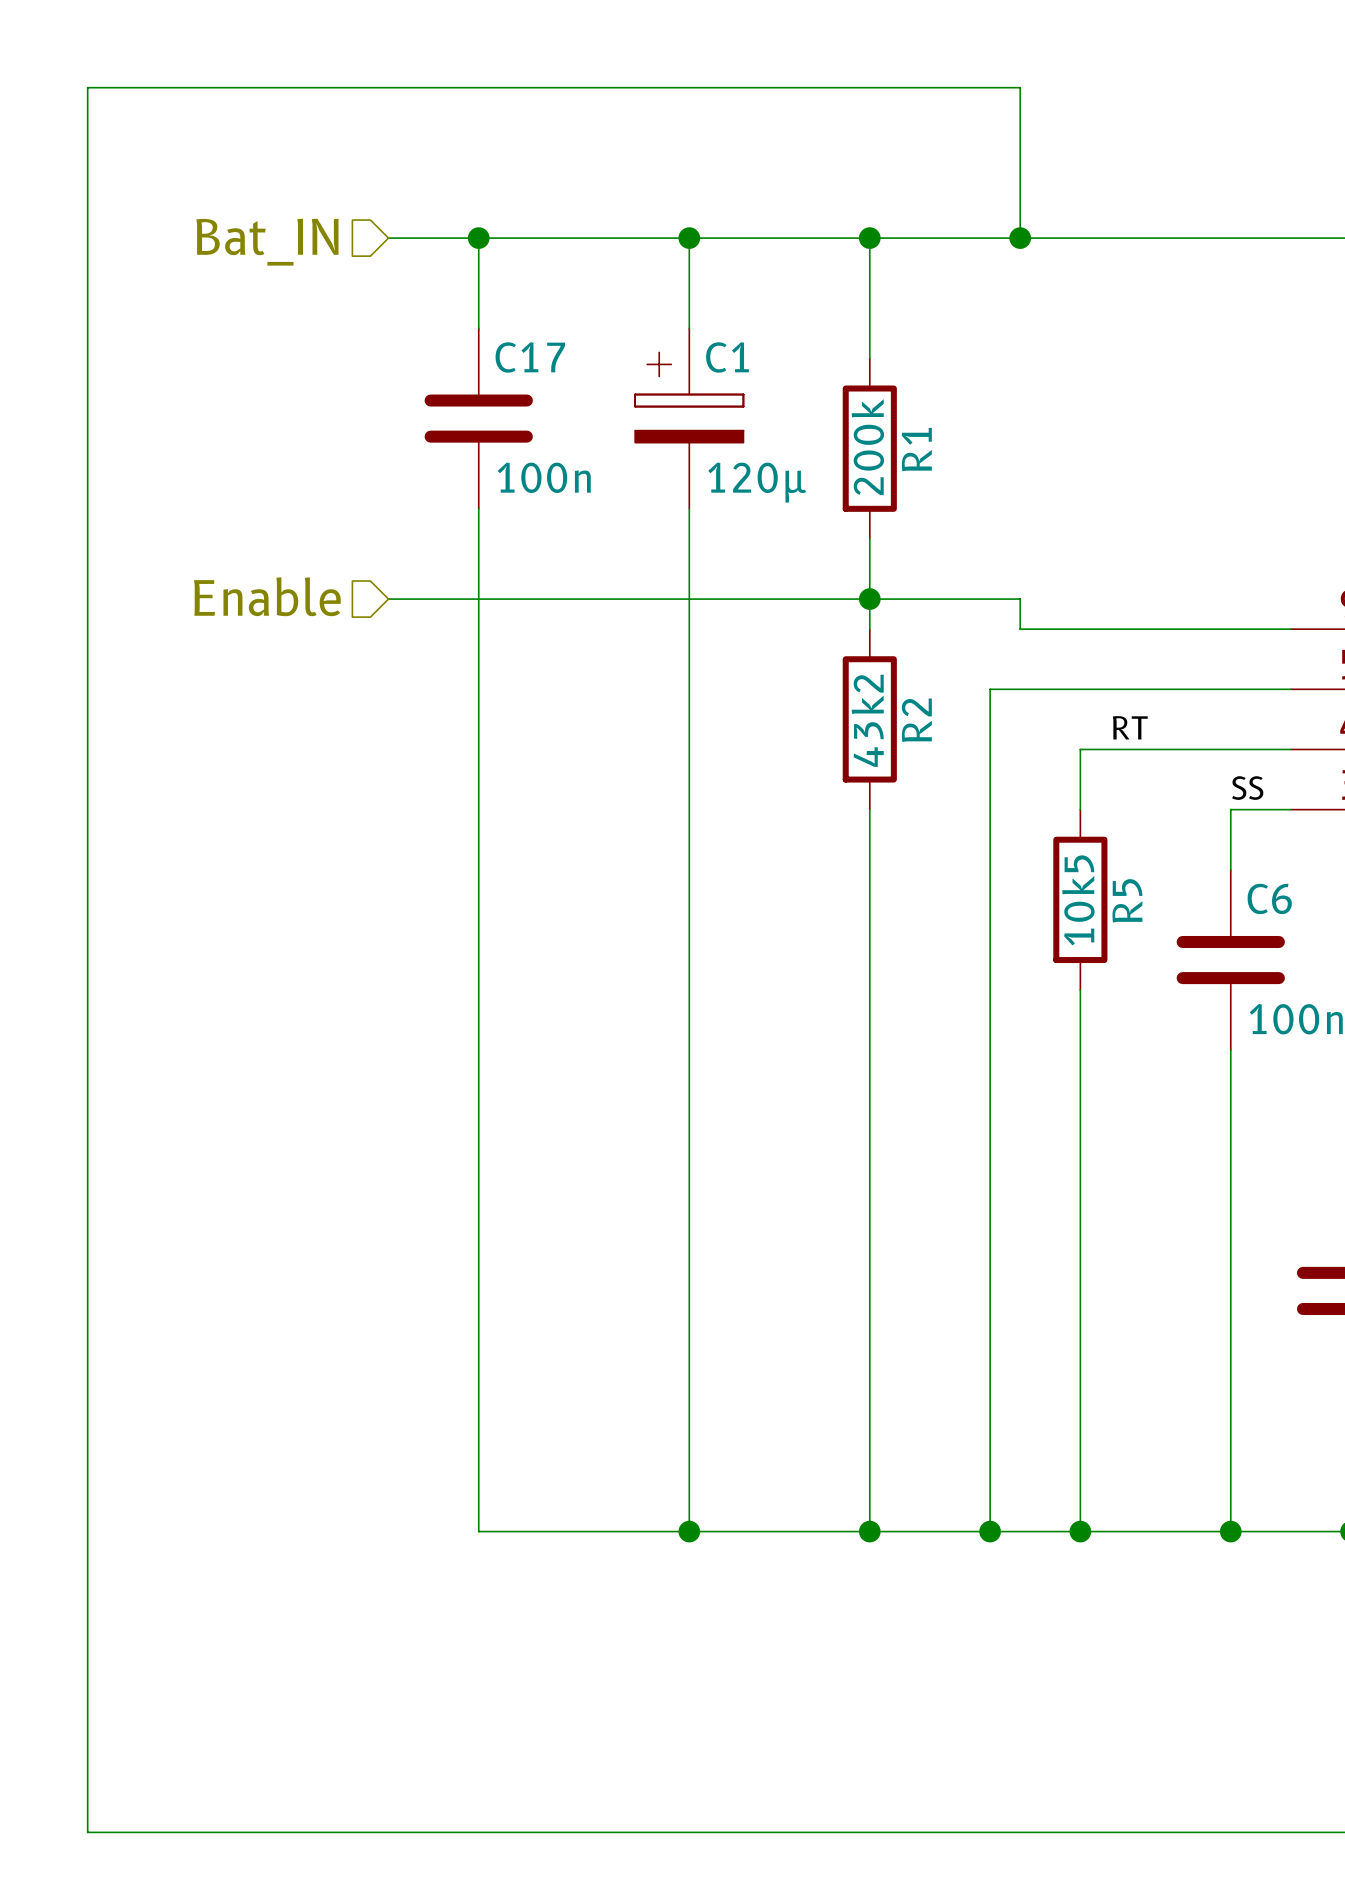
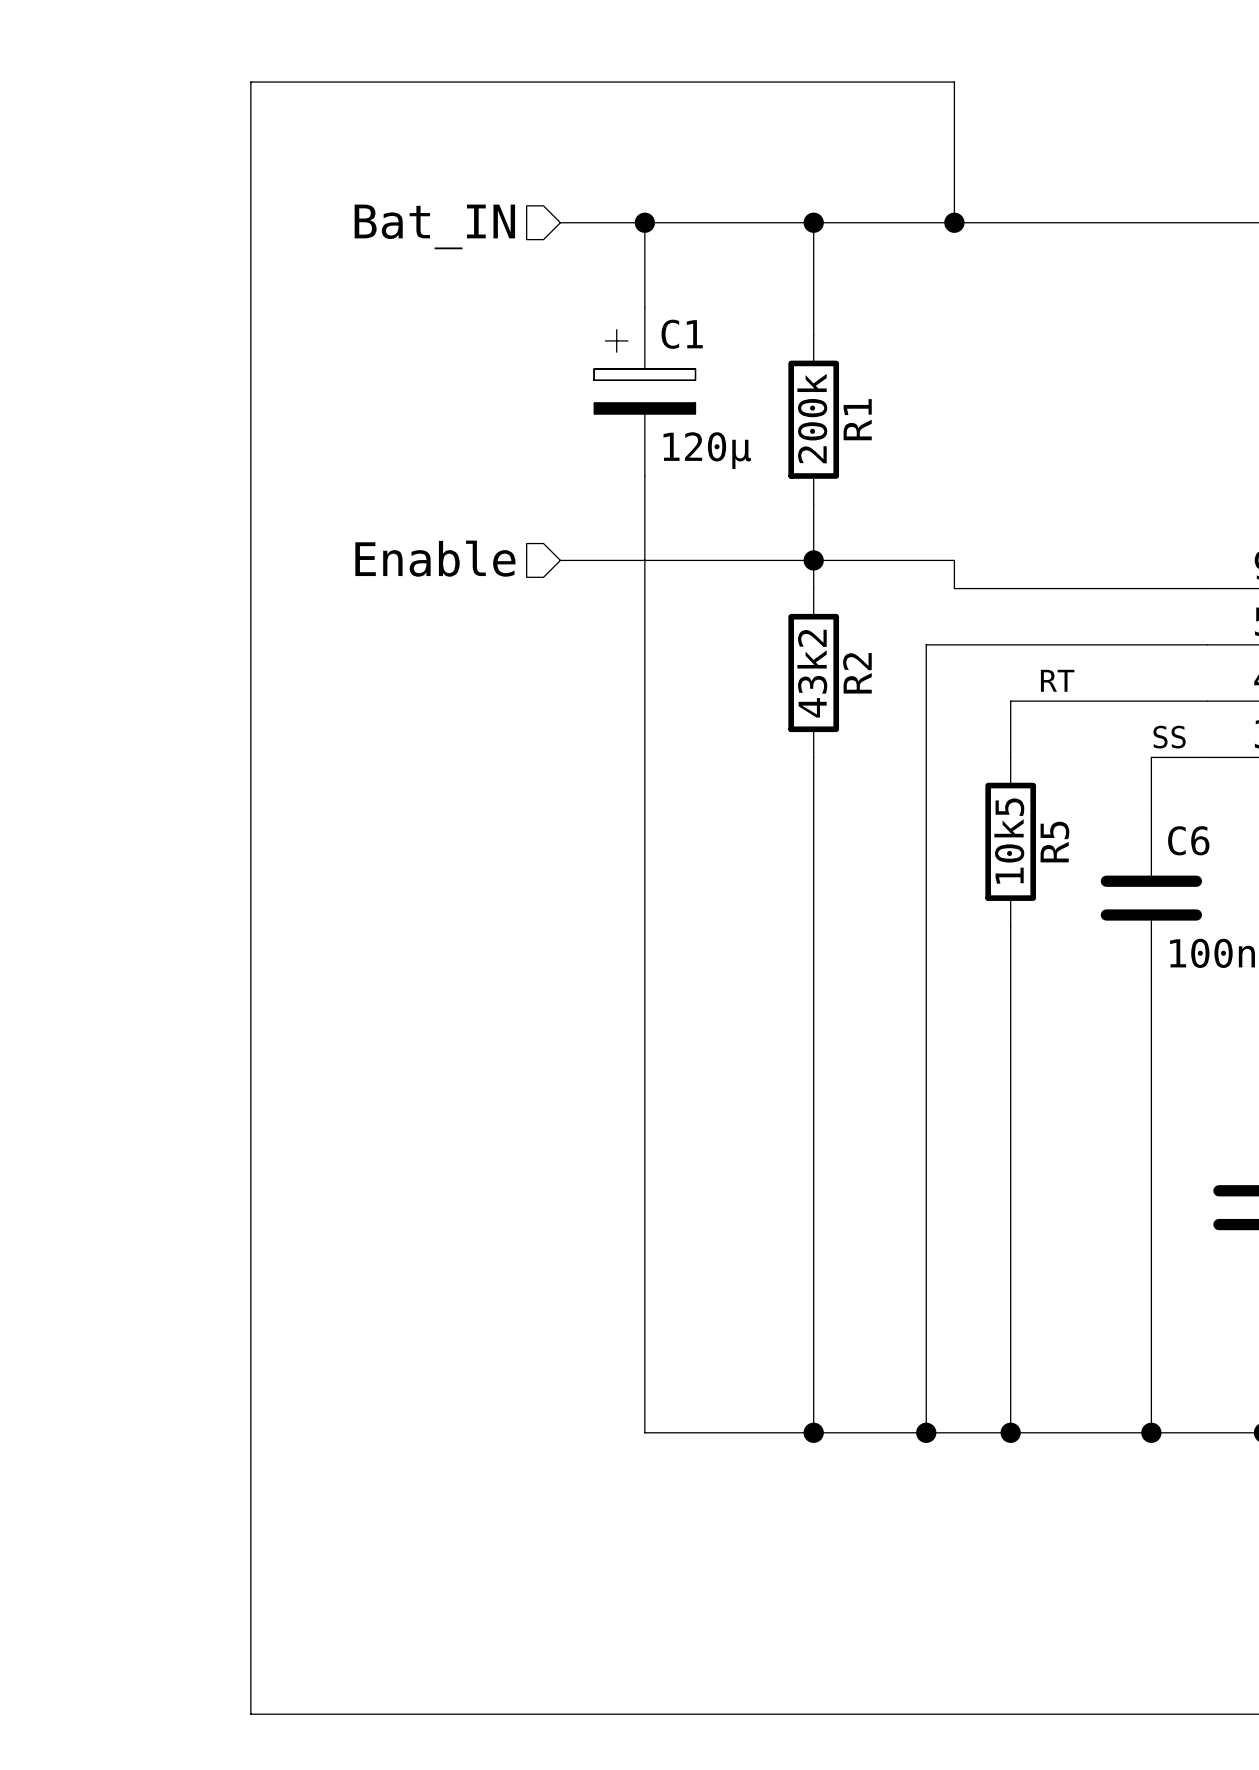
wire: (268, 87) (87, 87) (87, 1832) (268, 1832) -> (250, 82) (250, 1714)
wire: (388, 238) (599, 238) -> none
wire: (478, 238) (478, 328) -> none
junction: (478, 238) -> none
hierarchical label position: Bat_IN (267, 242) -> Bat_IN (434, 226)
C17: 100n (478, 418) -> none
wire: (478, 508) (478, 1531) (689, 1531) -> none
hierarchical label position: Enable (267, 596) -> Enable (435, 558)
wire: (388, 599) (599, 599) -> none
junction: (689, 1531) -> none

